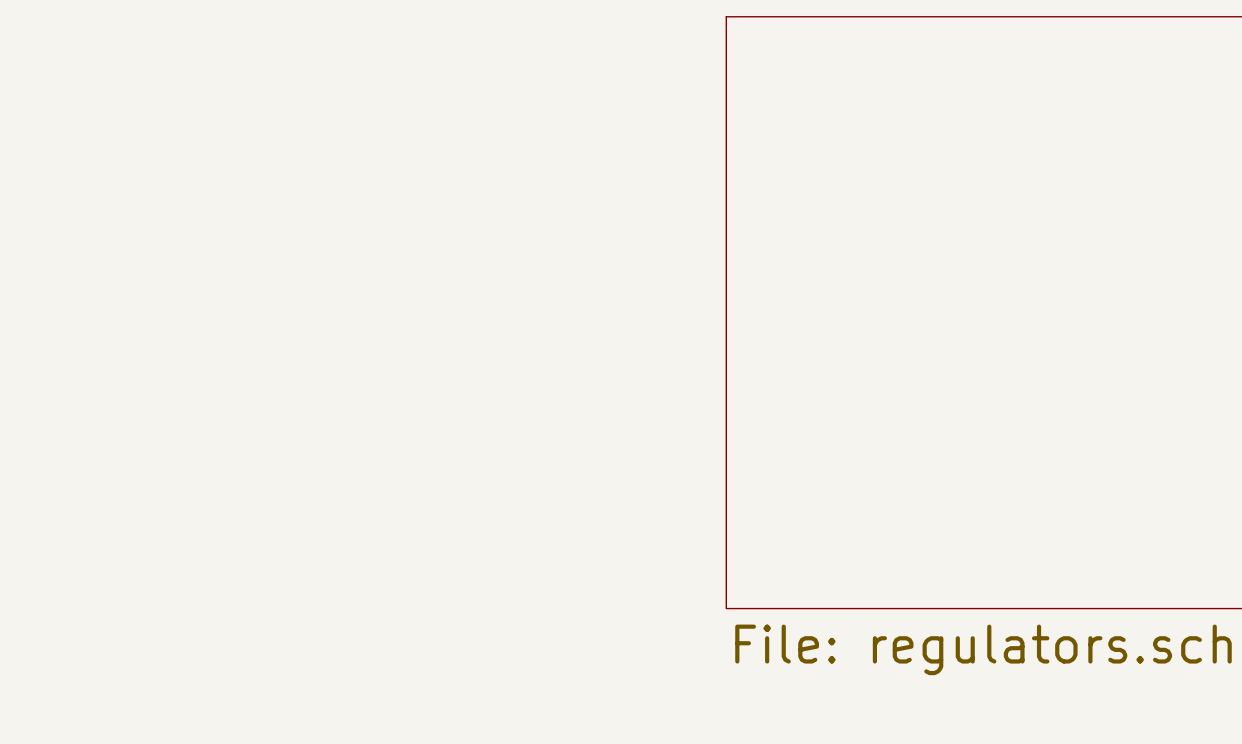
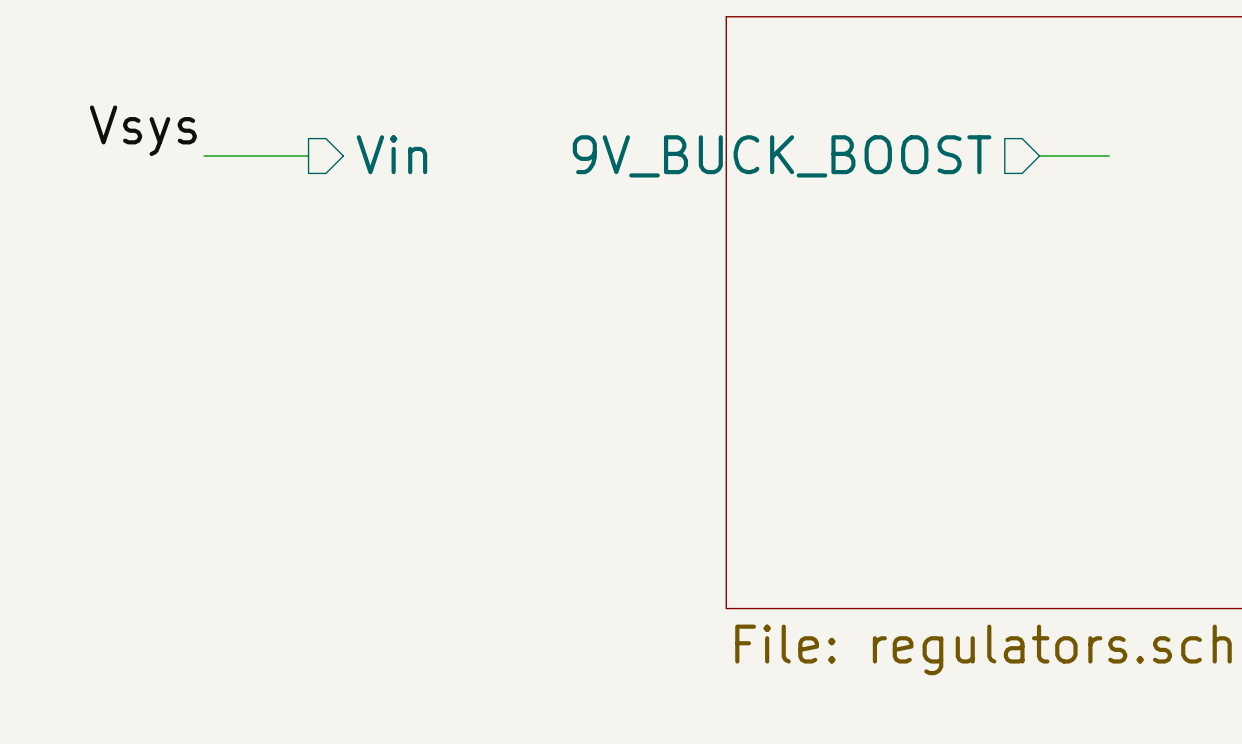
label: none -> Vsys (143, 130)
sheet pin: none -> Vin (391, 154)
wire: none -> (204, 156) (308, 156)
sheet pin: none -> 9V_BUCK_BOOST (782, 156)
wire: none -> (1039, 156) (1109, 156)

